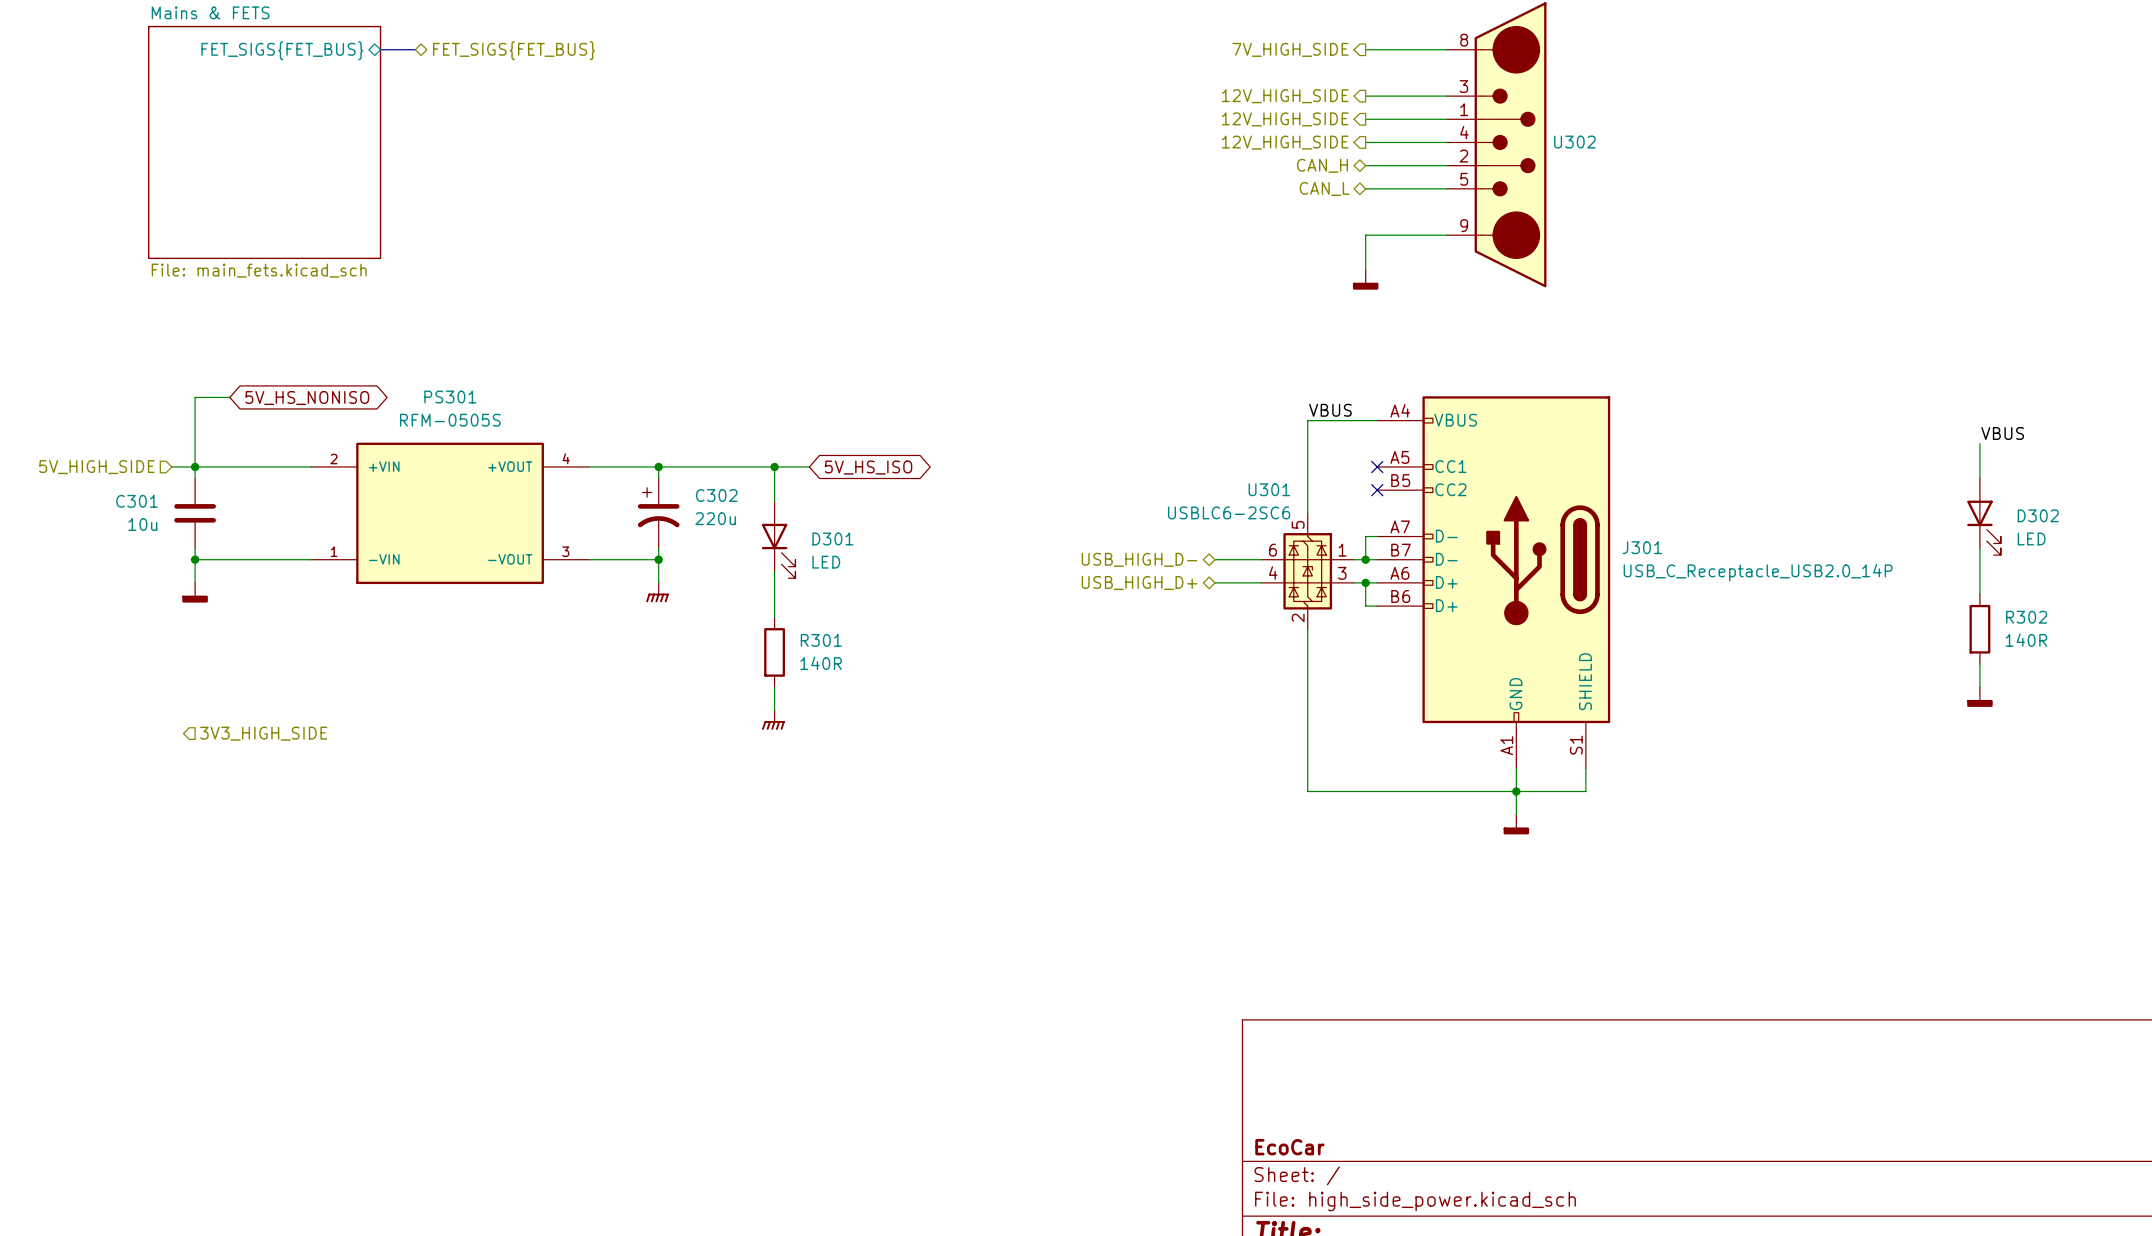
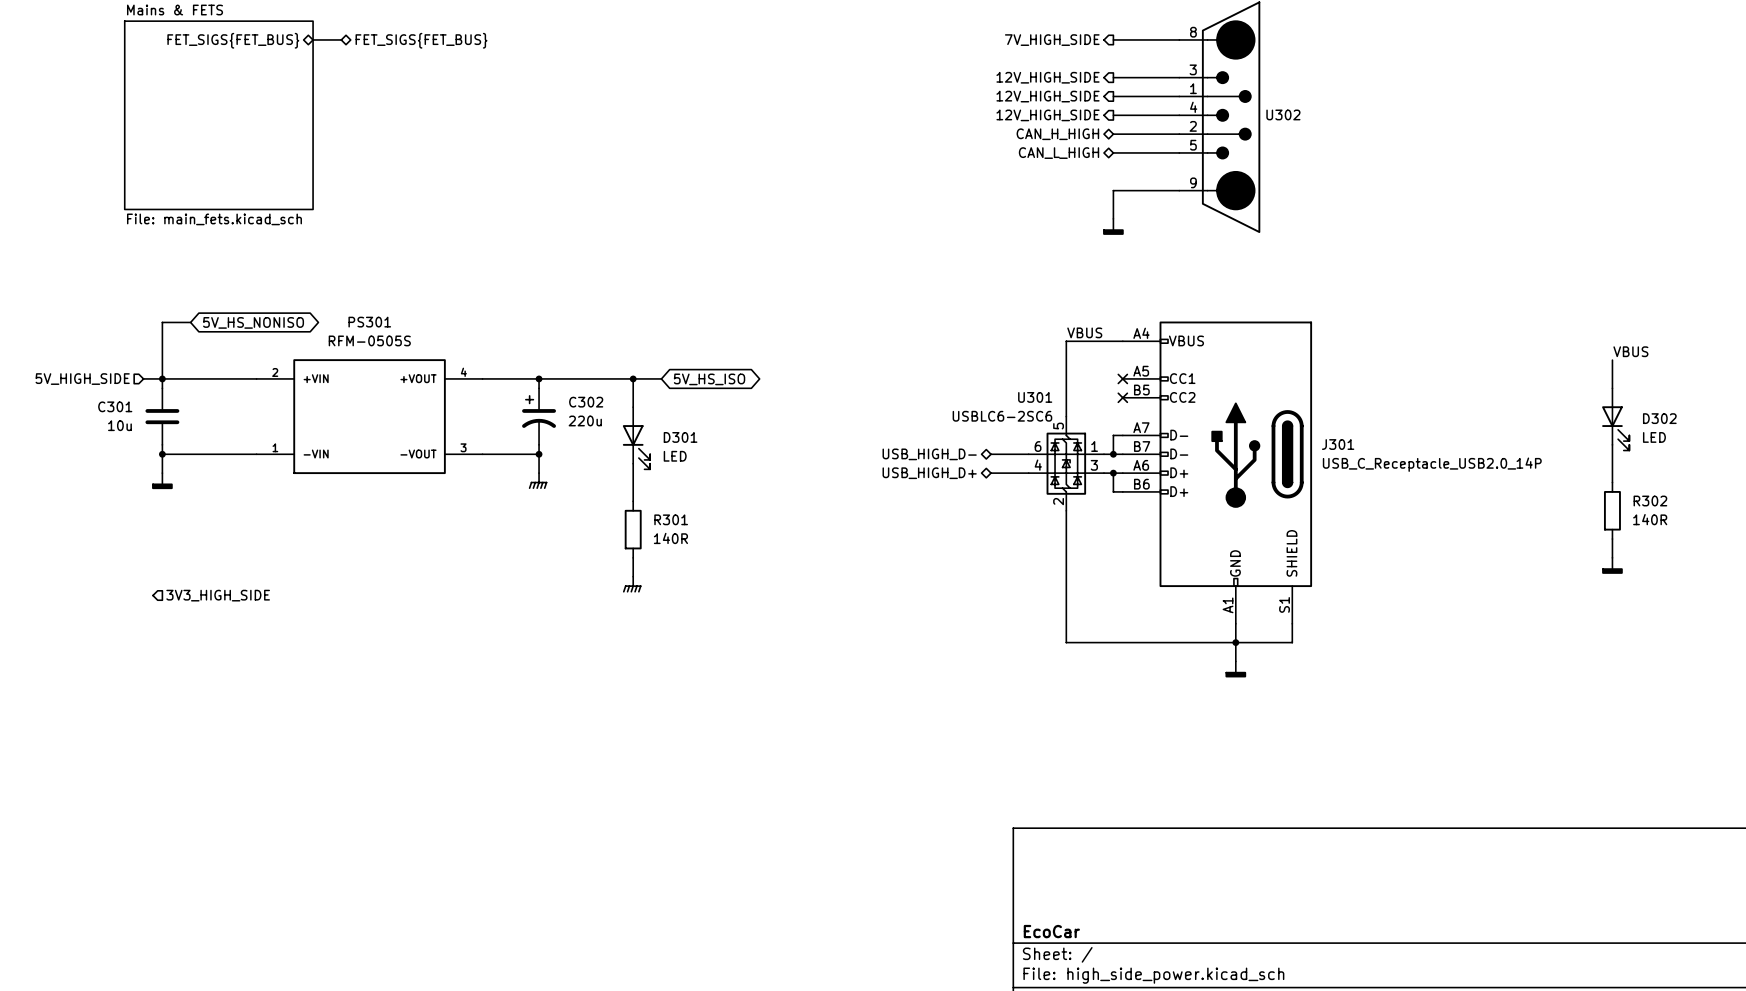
hierarchical label: CAN_H (1322, 165) -> CAN_H_HIGH (1057, 134)
hierarchical label: CAN_L (1324, 188) -> CAN_L_HIGH (1059, 153)

